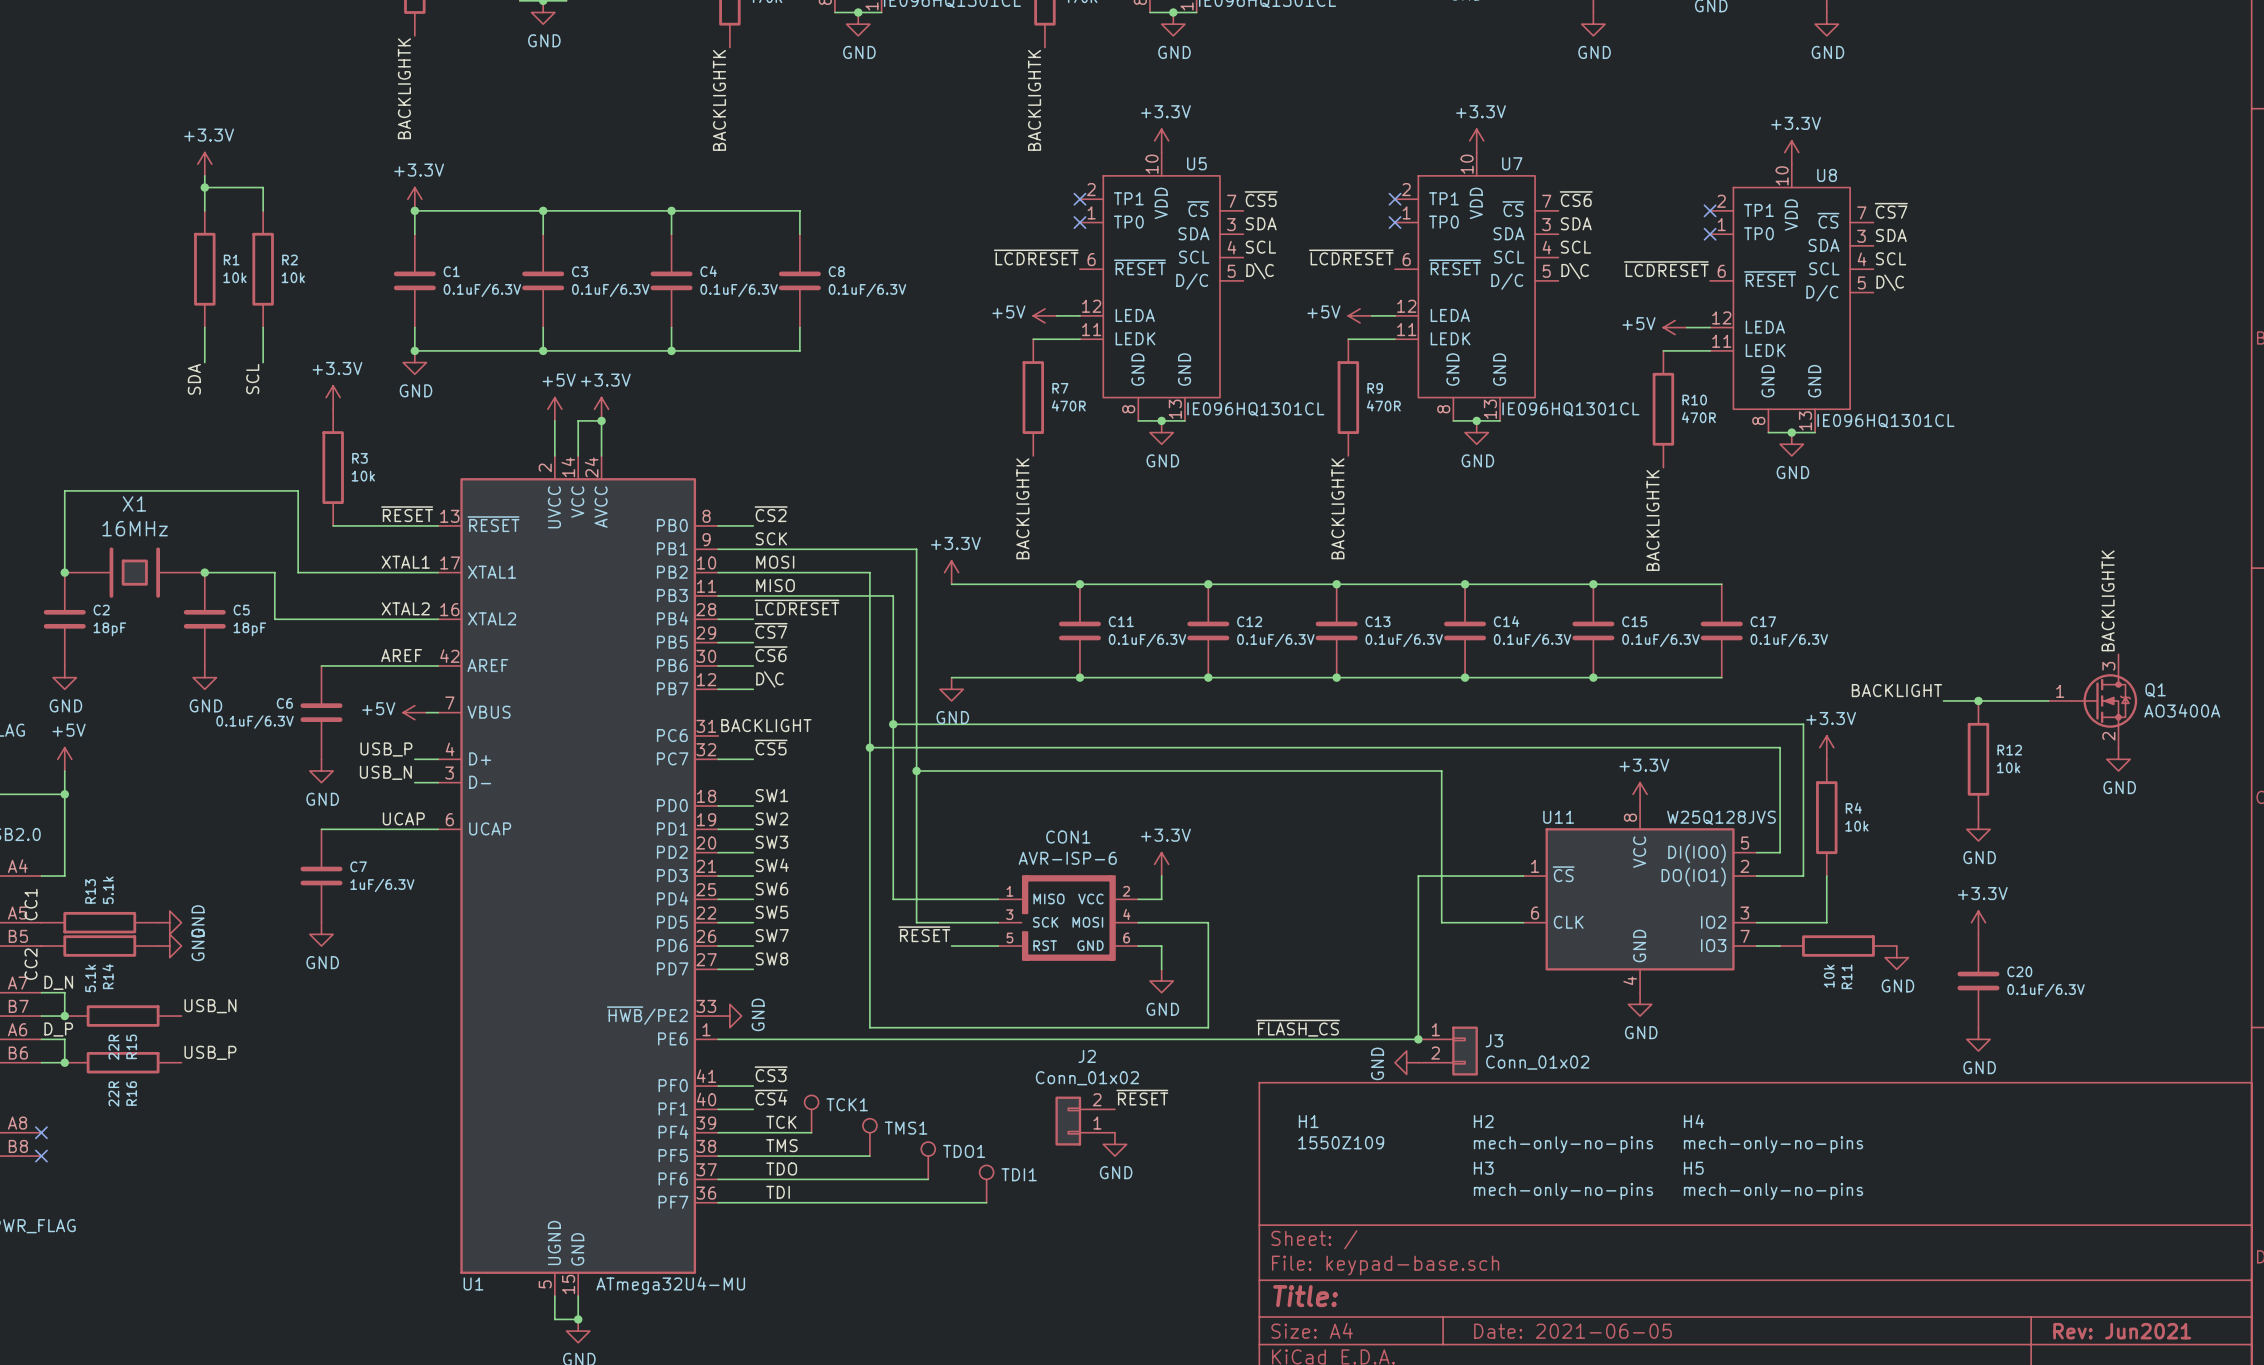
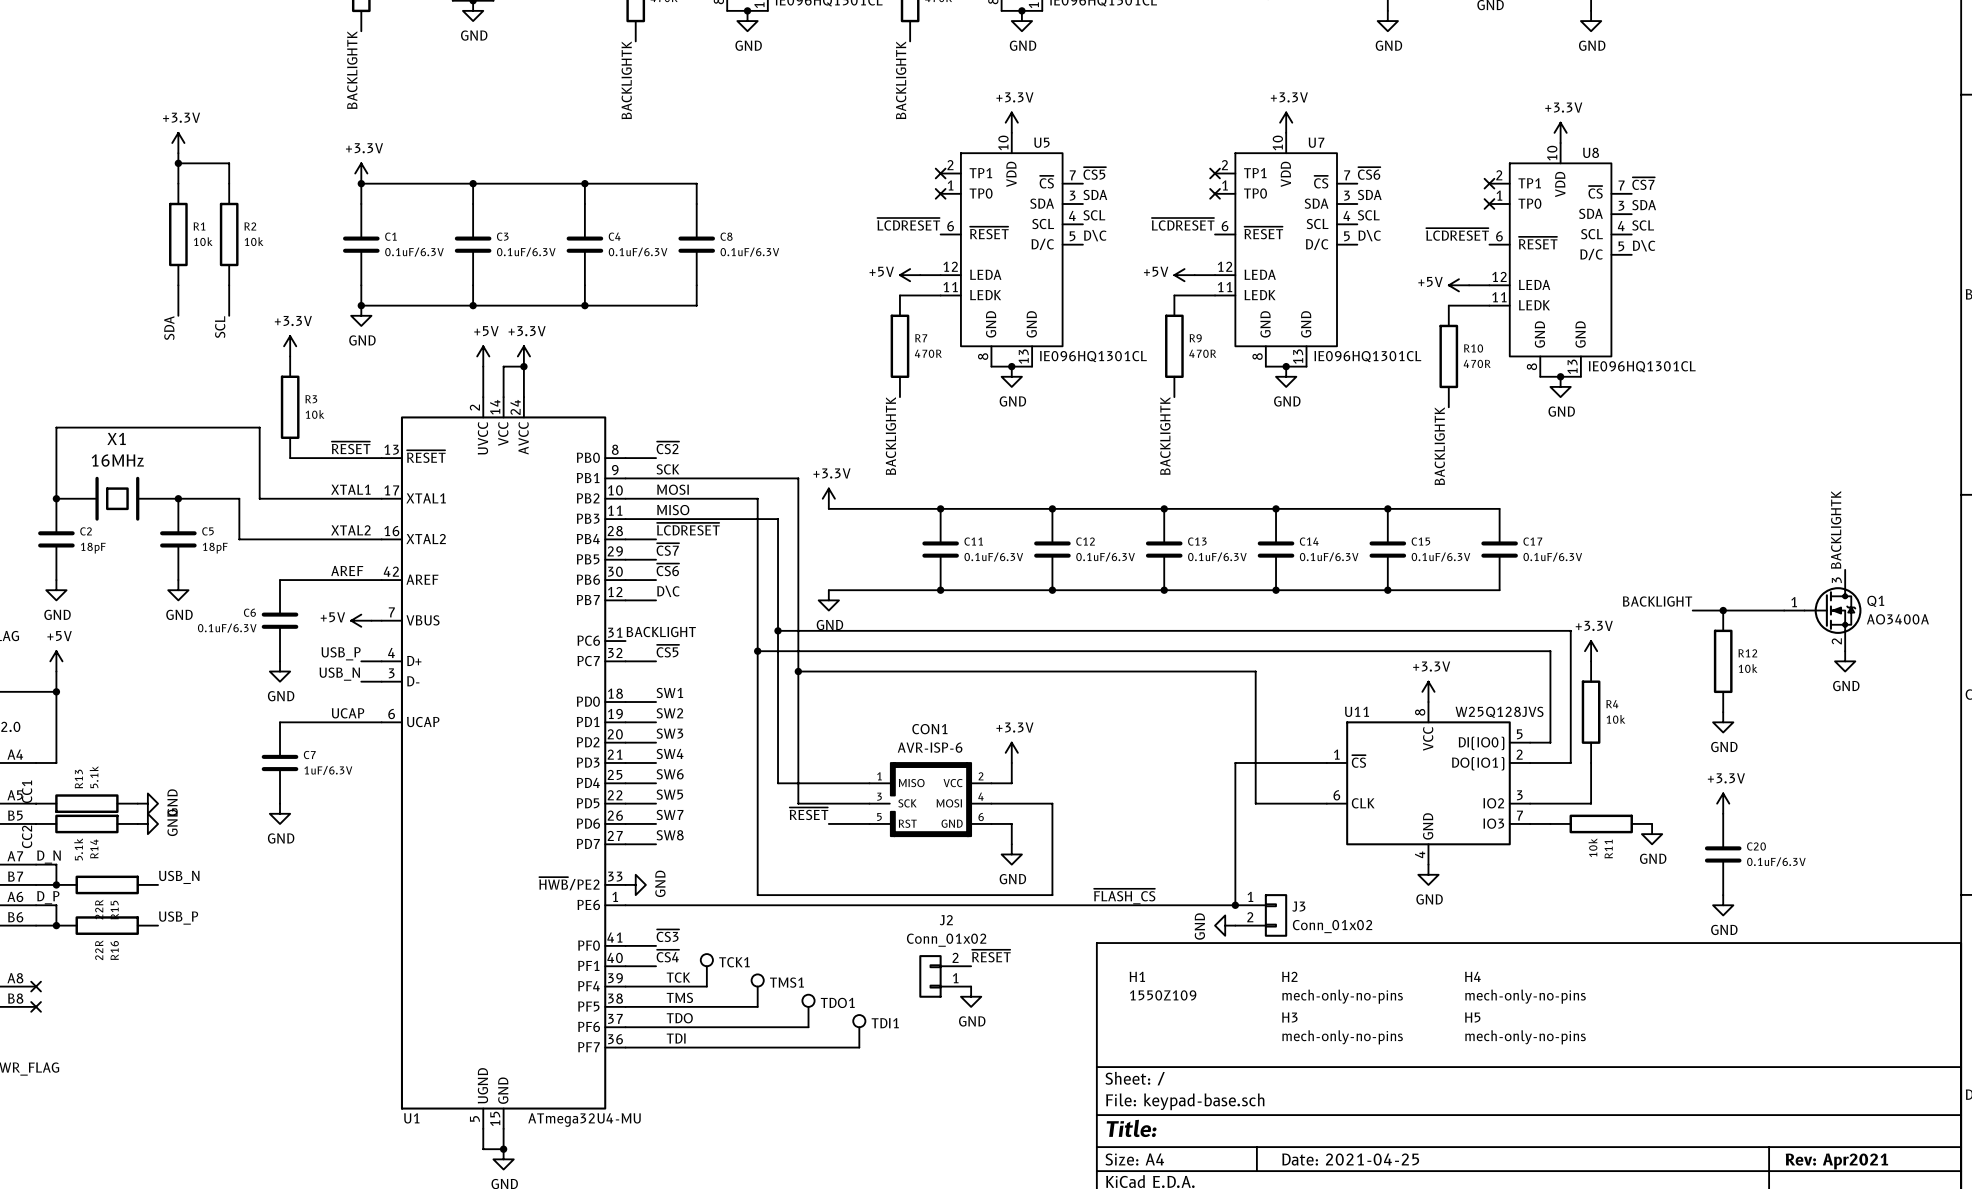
title block: Date: 2021-06-05 (1572, 1331) -> Date: 2021-04-25 (1350, 1159)
title block: Rev: Jun2021 (2122, 1331) -> Rev: Apr2021 (1836, 1161)

